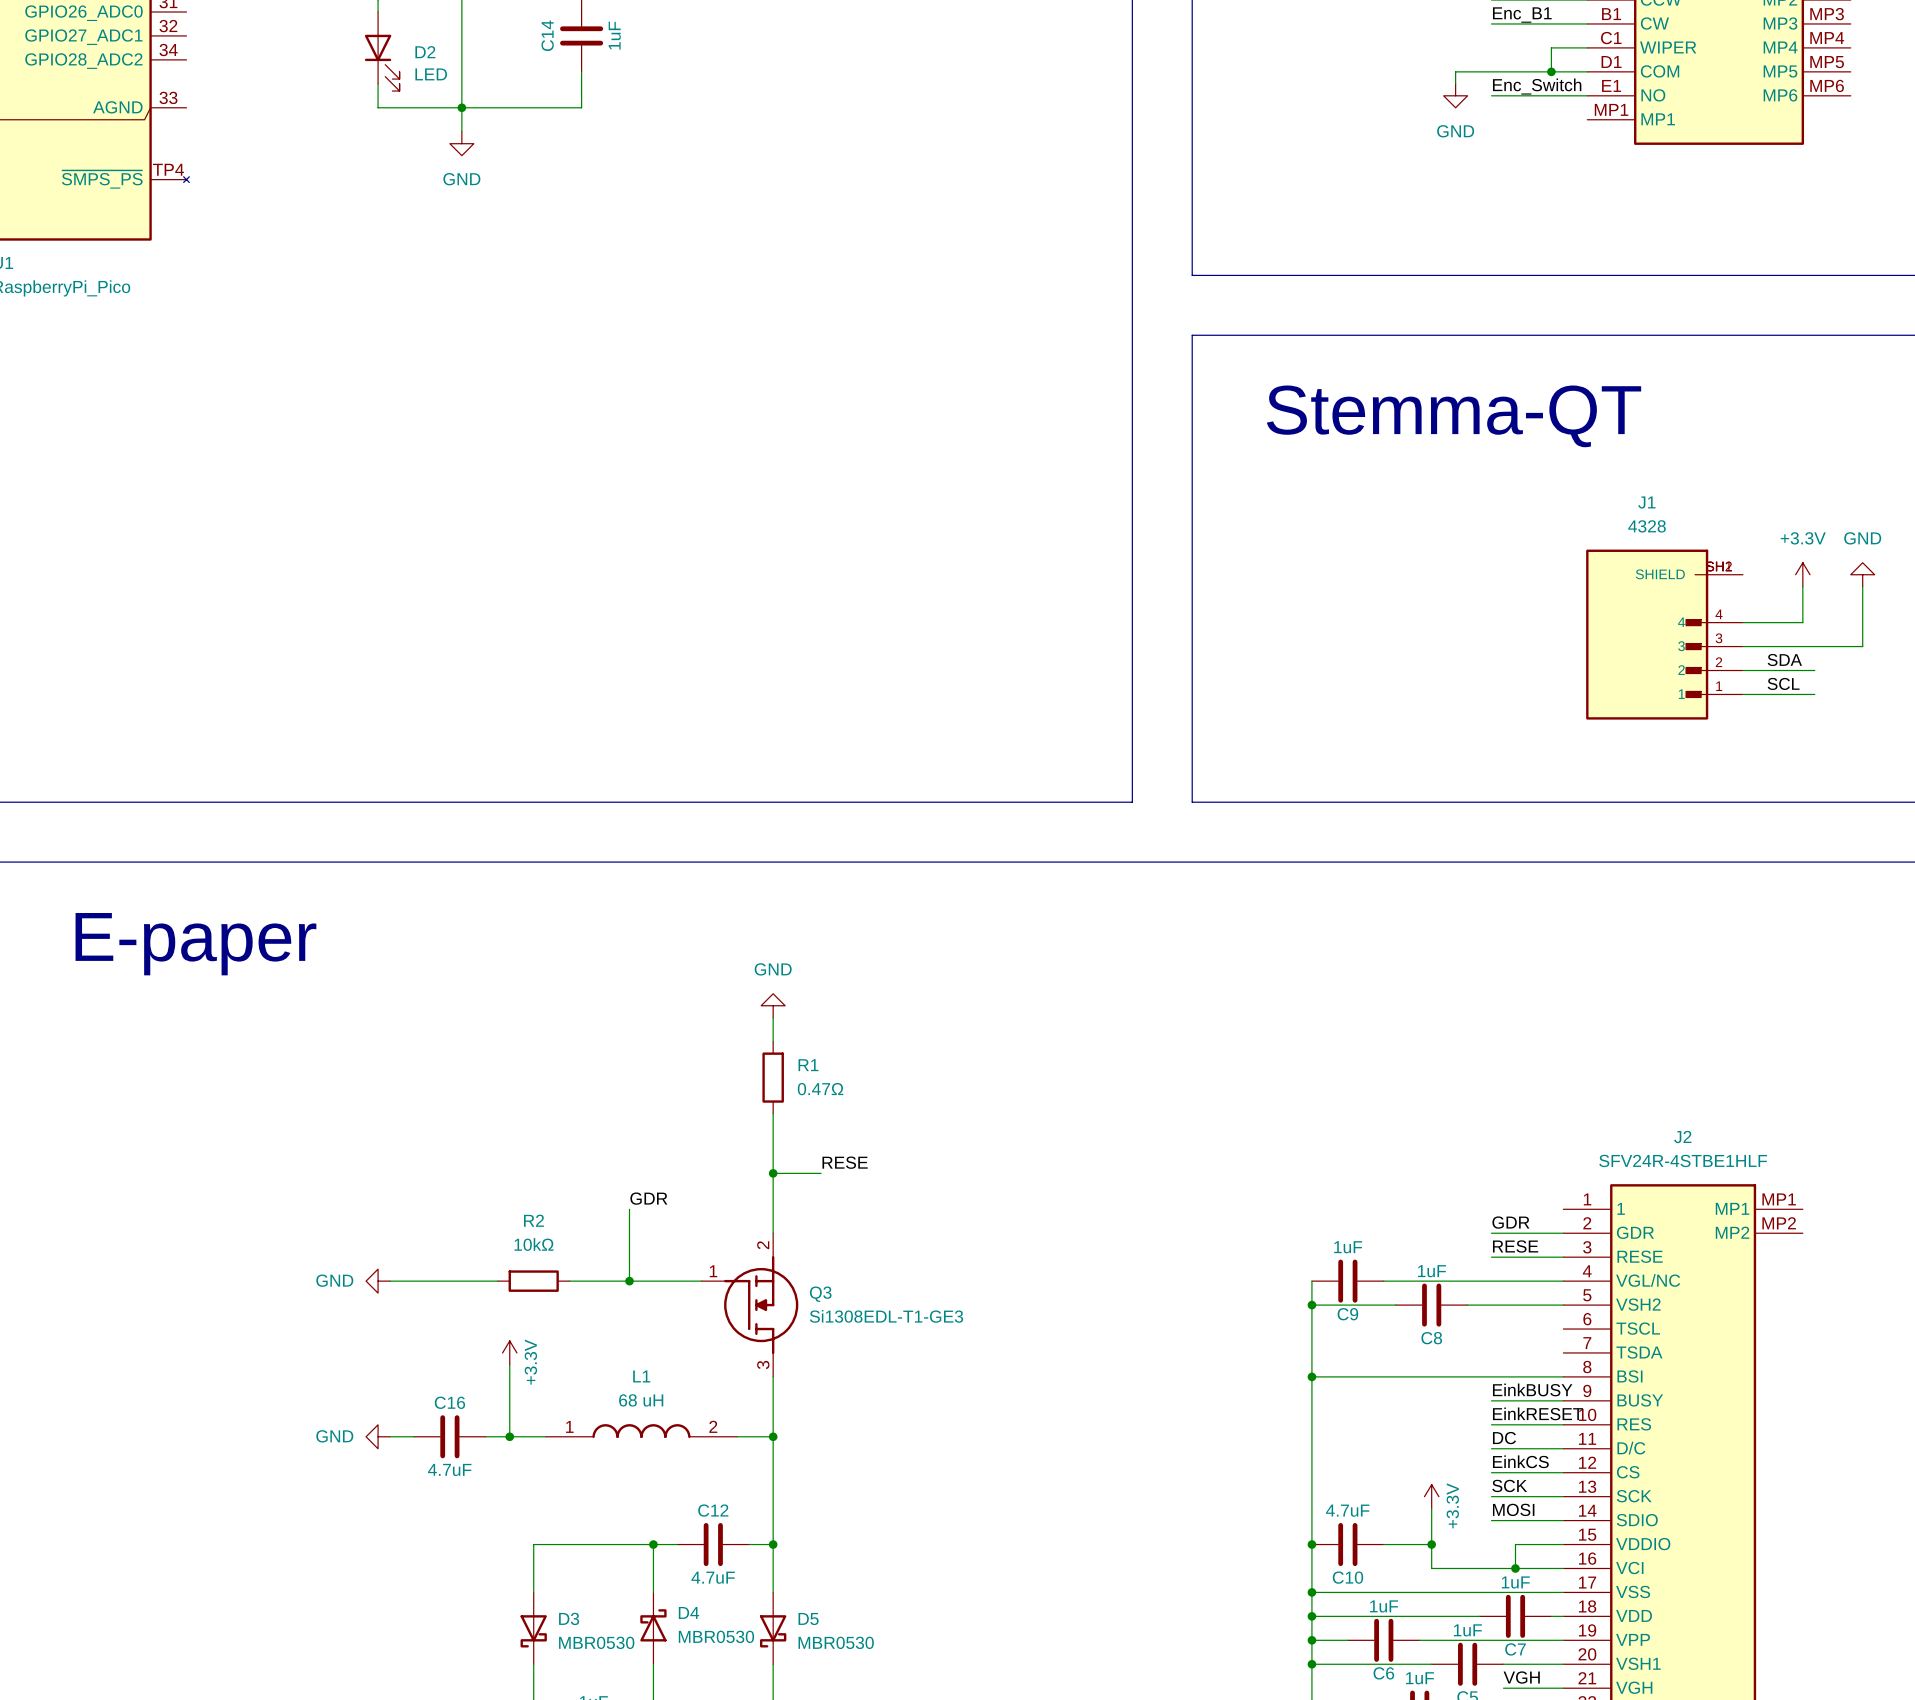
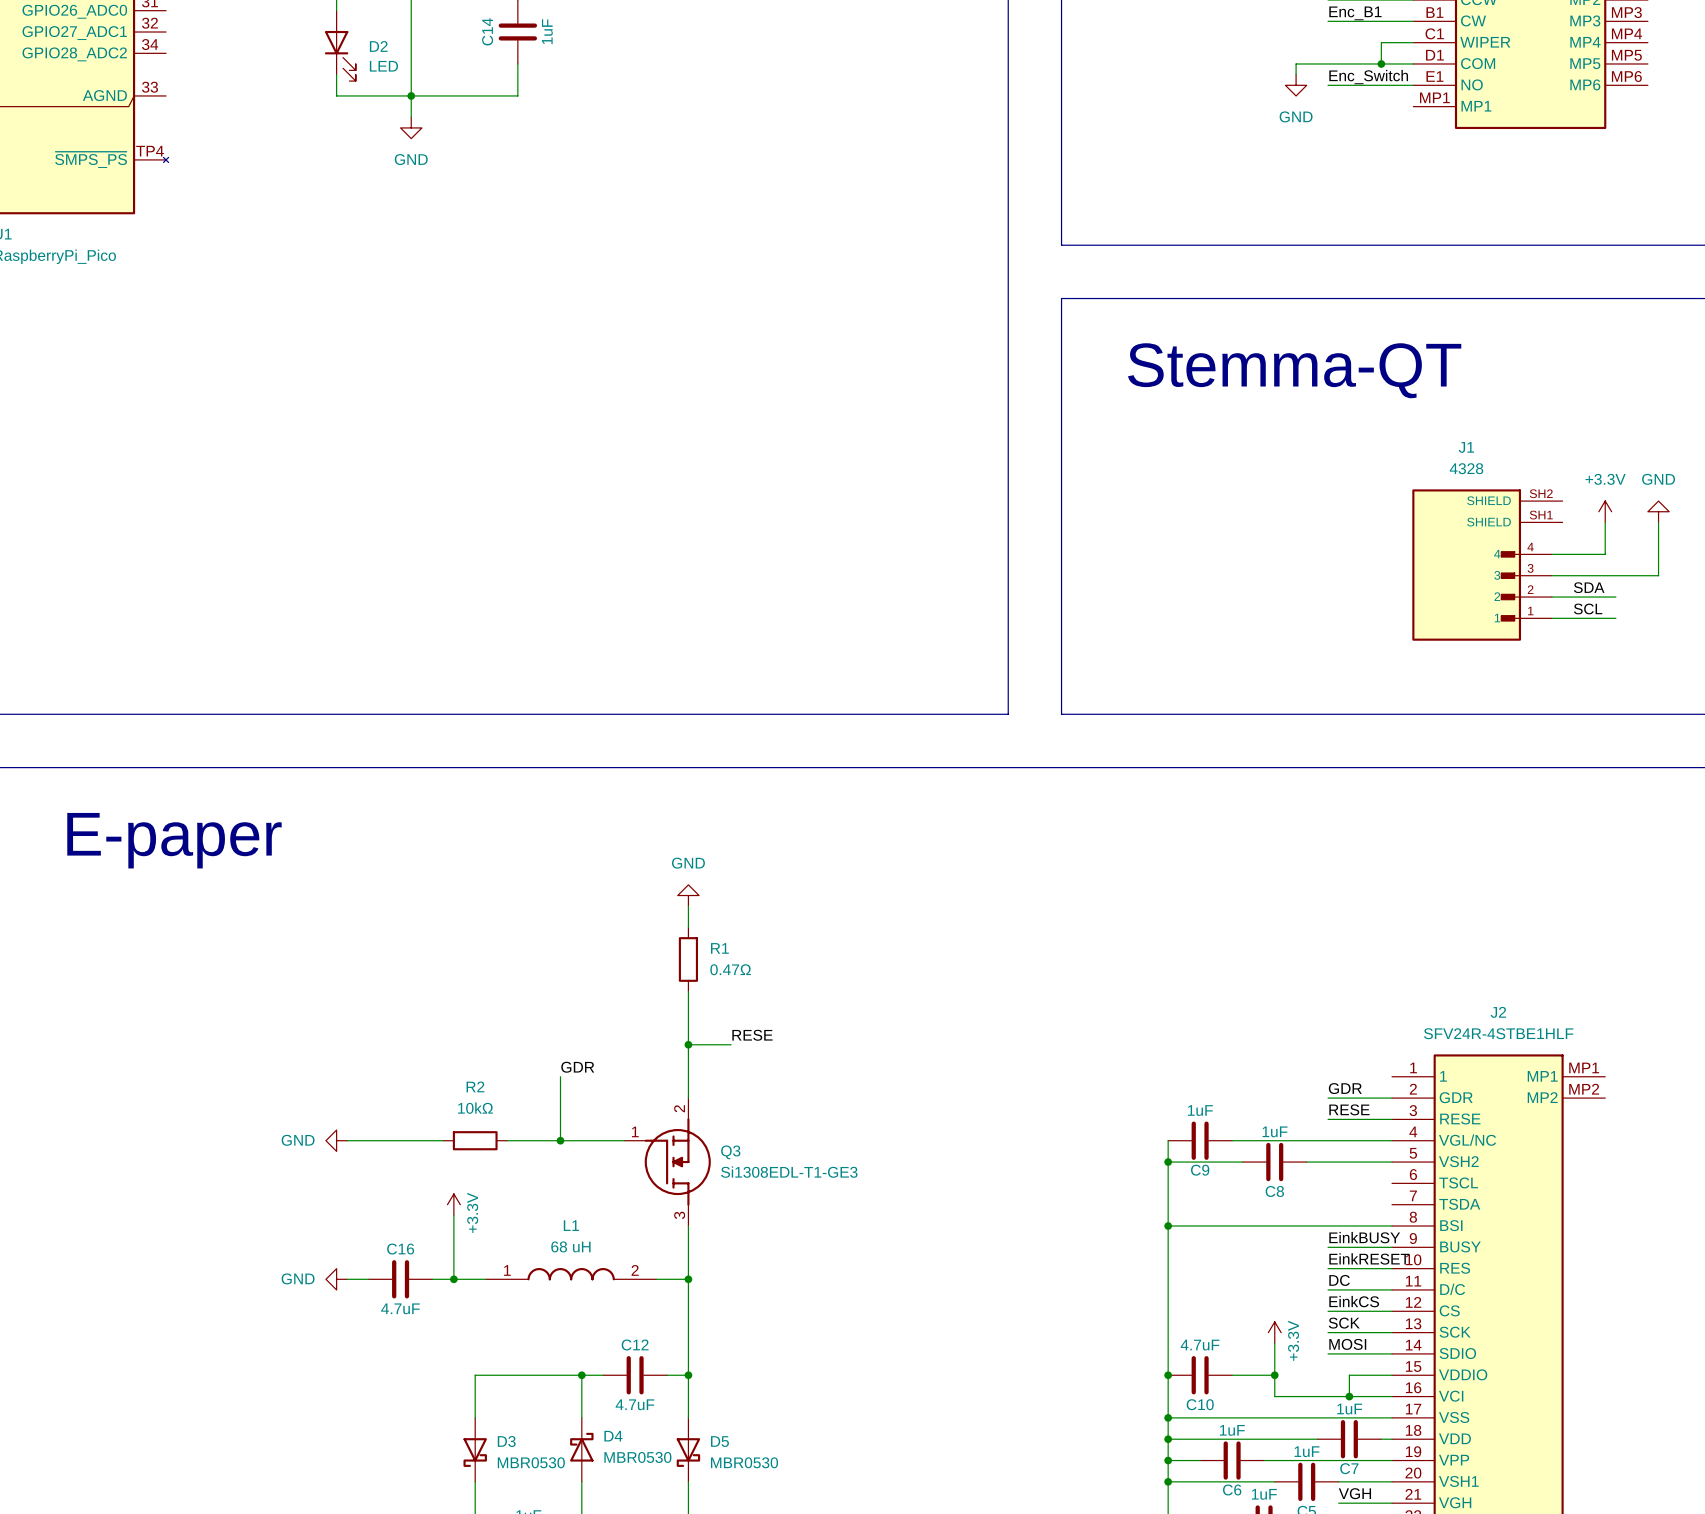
J1 symbol: [1586, 549, 1743, 720] -> [1412, 489, 1563, 641]

